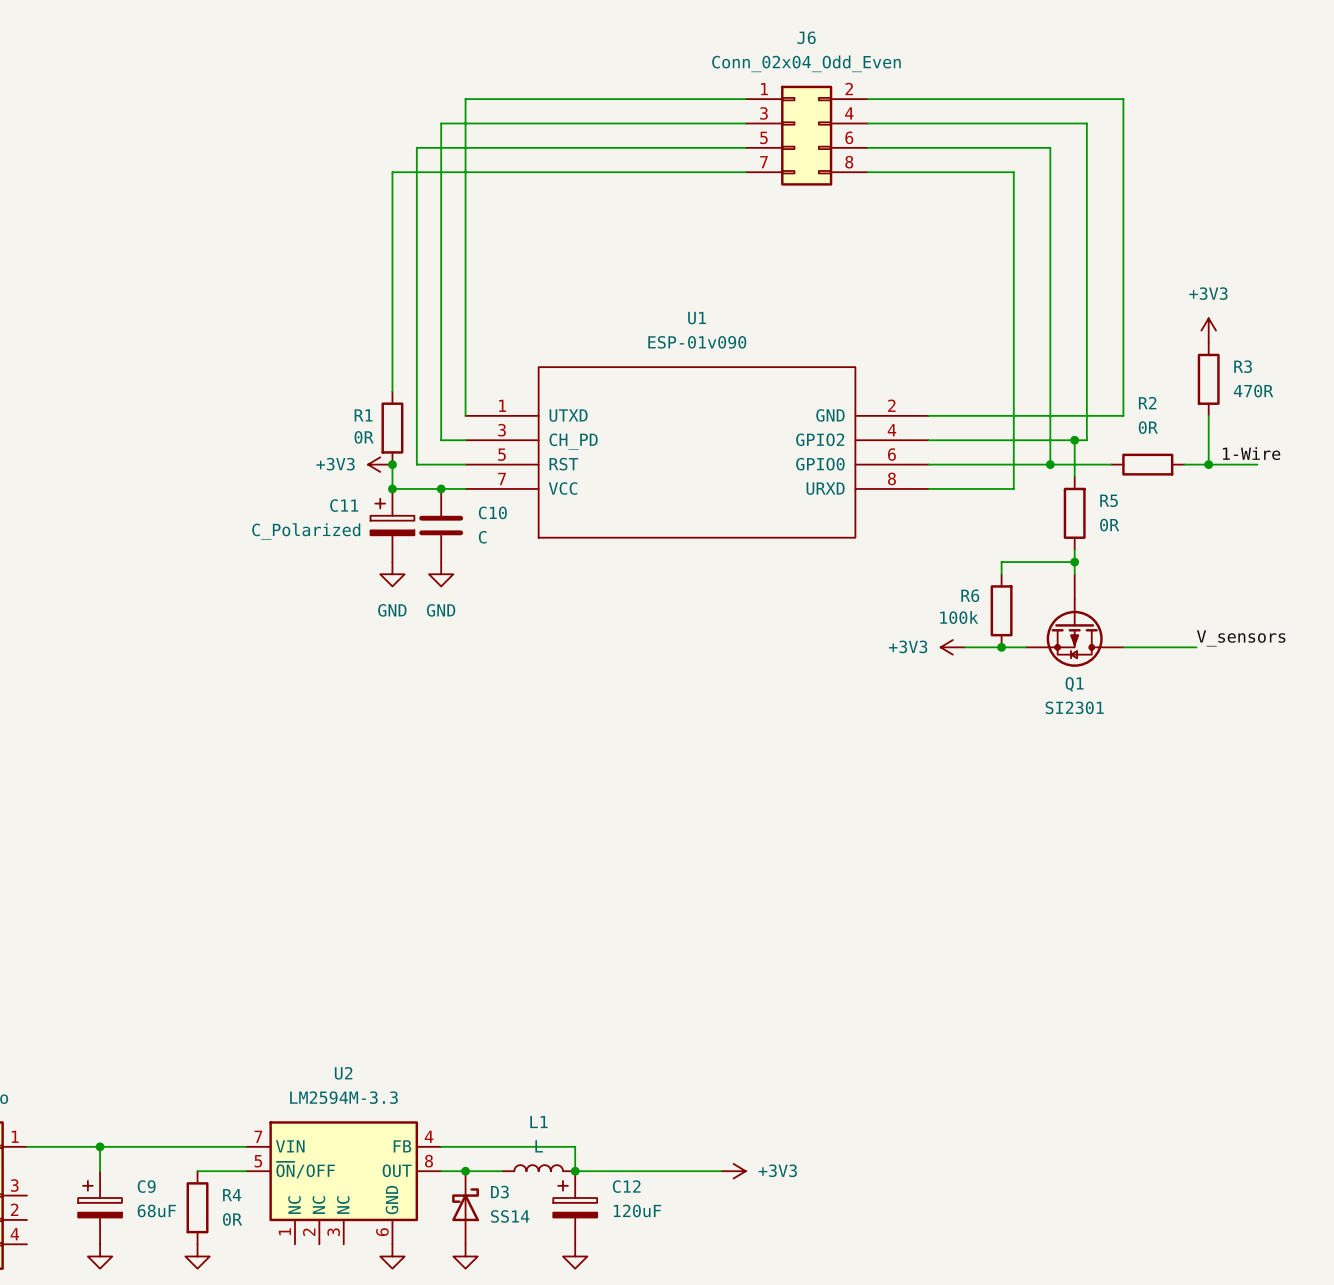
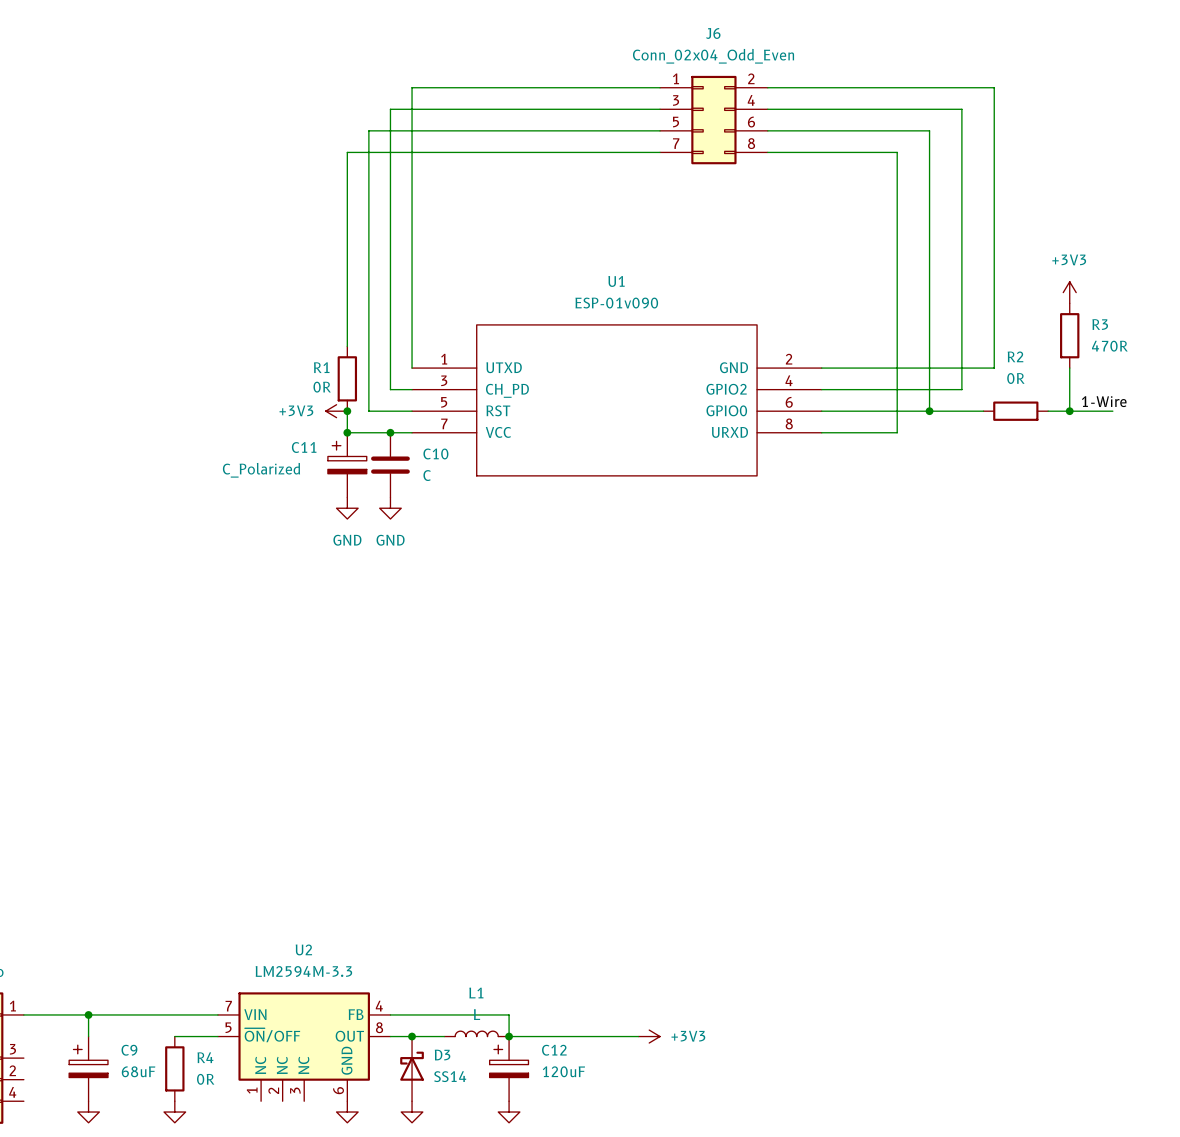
wire: (1074, 440) (1074, 476) -> none
junction: (1074, 440) -> none
R5: 0R (1074, 513) -> none
wire: (1074, 549) (1074, 574) -> none
wire: (1074, 562) (1001, 562) (1001, 574) -> none
junction: (1074, 562) -> none
R6: 100k (1001, 610) -> none
Q1: SI2301 (1074, 620) -> none
label: V_sensors (1241, 638) -> none
power symbol: +3V3 (952, 647) -> none
wire: (965, 647) (1025, 647) -> none
junction: (1001, 647) -> none
wire: (1123, 647) (1196, 647) -> none

